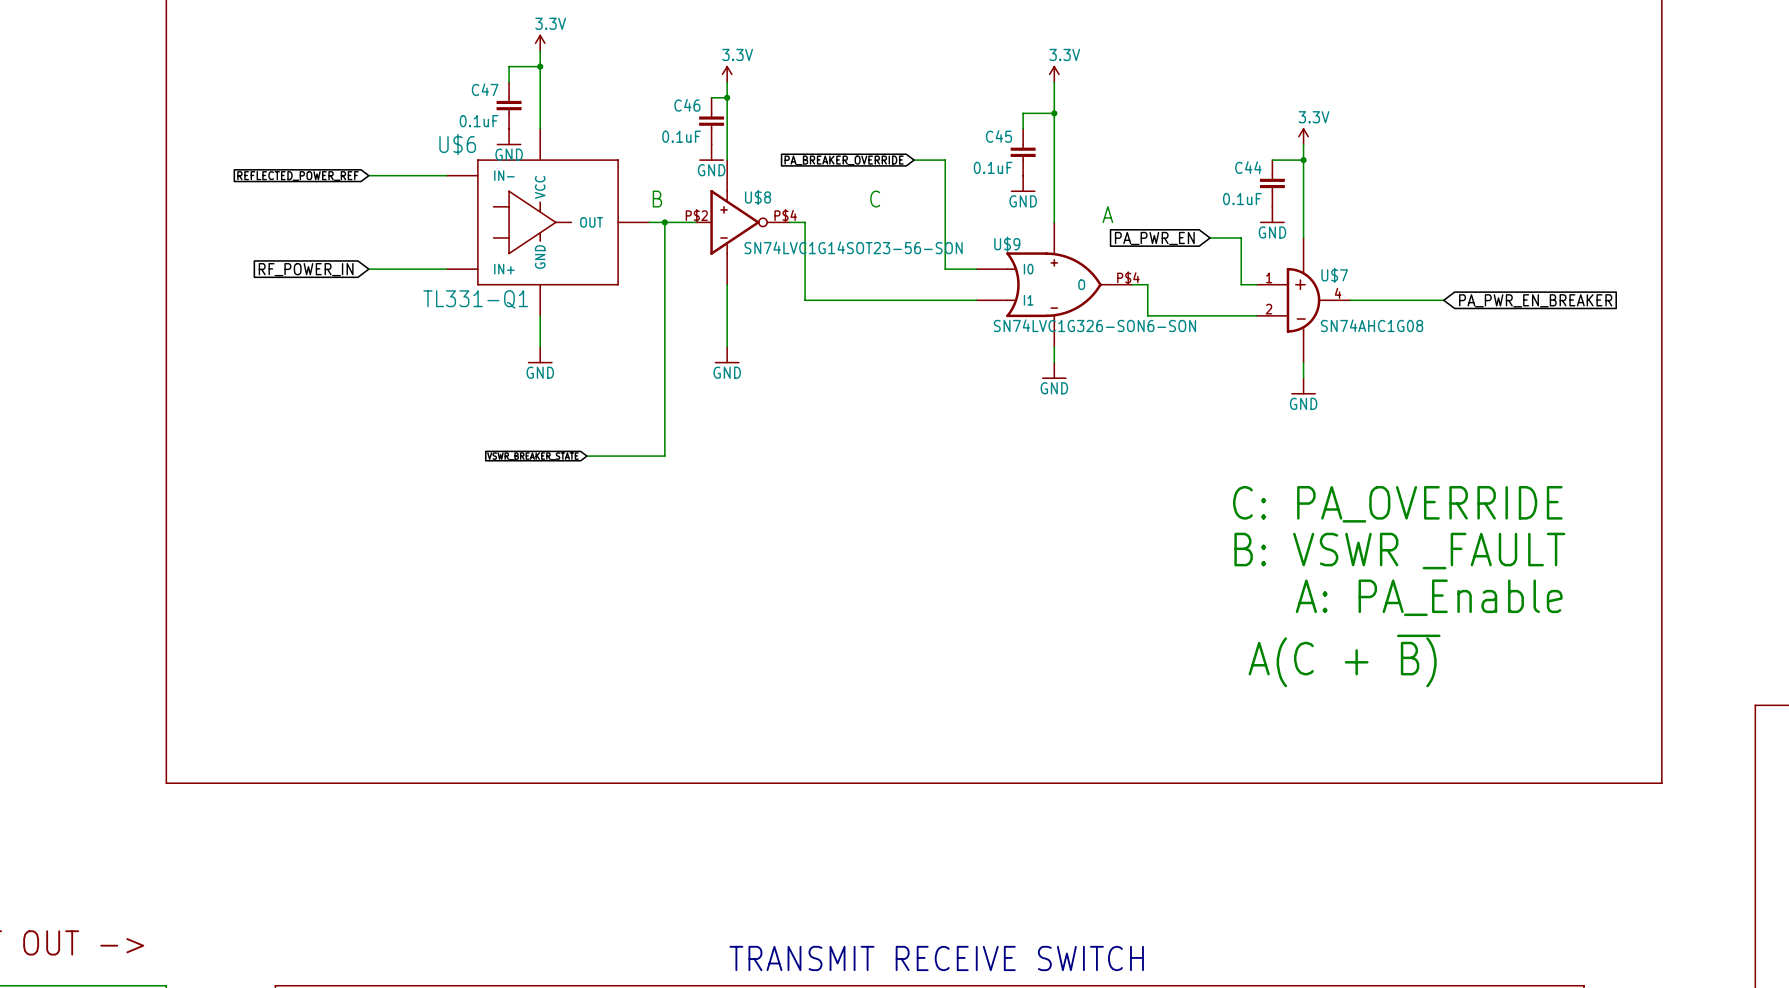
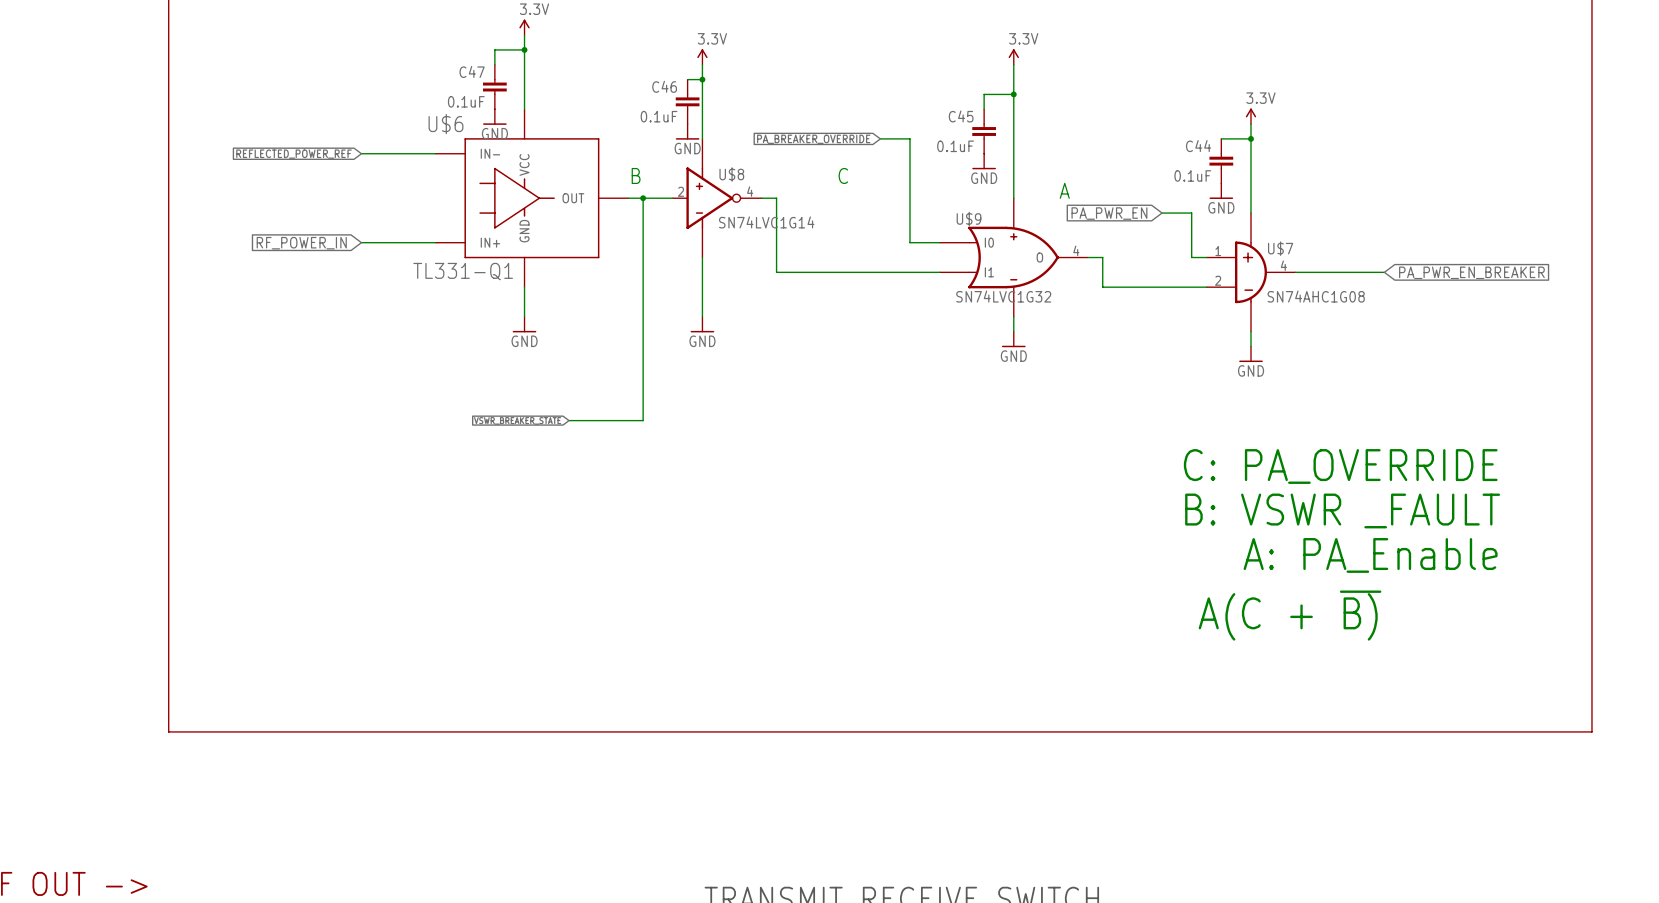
U$8 pin number: P$2 (696, 215) -> 2 (680, 191)
U$8 pin number: P$4 (785, 215) -> 4 (750, 191)
U$8 value: SN74LVC1G14SOT23-56-SON (853, 247) -> SN74LVC1G14 (766, 222)
U$9 pin number: P$4 (1128, 277) -> 4 (1076, 250)
U$9 value: SN74LVC1G326-SON6-SON (1094, 325) -> SN74LVC1G32 (1003, 296)

